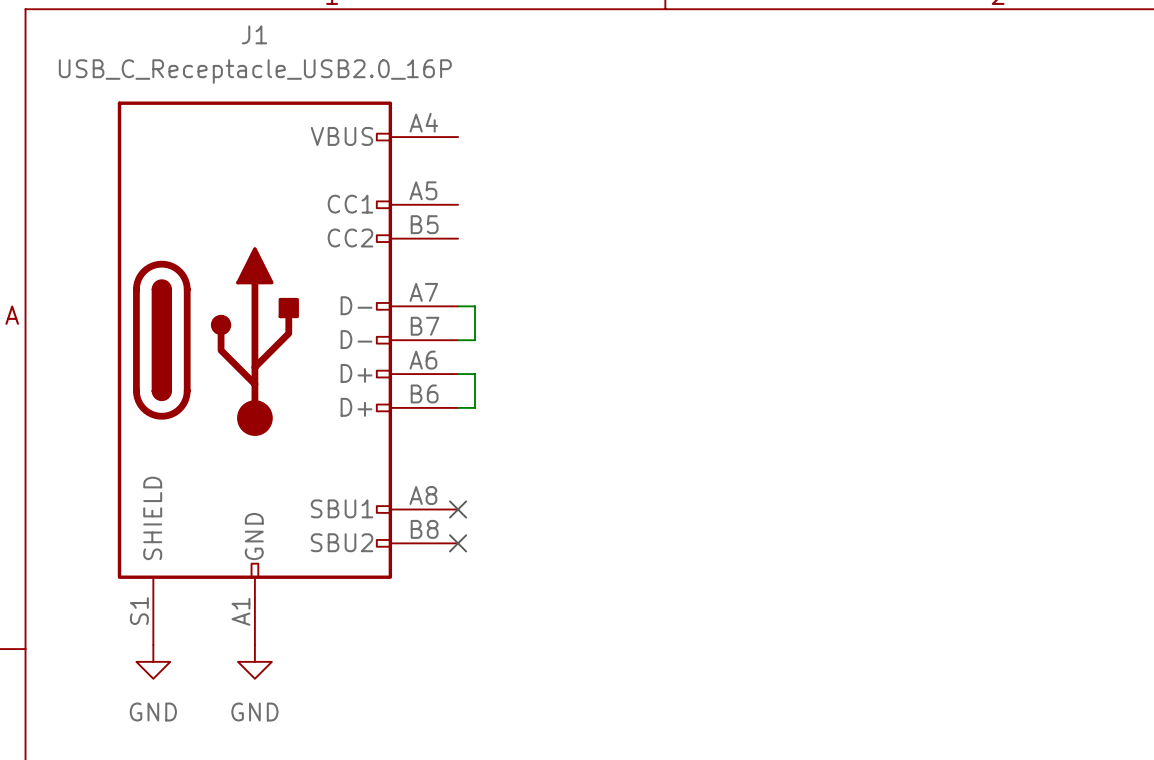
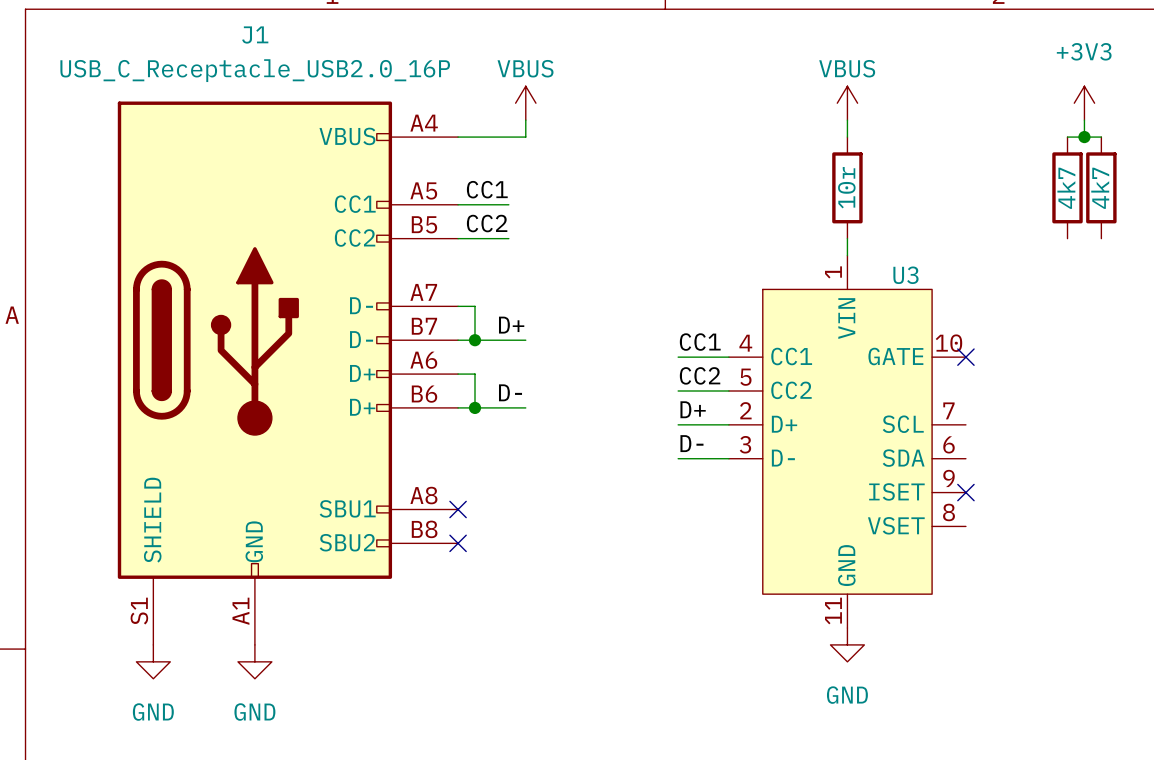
power symbol: none -> VBUS (525, 103)
power symbol: none -> VBUS (847, 103)
power symbol: none -> +3V3 (1084, 103)
wire: none -> (525, 120) (525, 137) (458, 137)
wire: none -> (847, 120) (847, 137)
wire: none -> (1084, 120) (1084, 137)
wire: none -> (1067, 137) (1101, 137)
junction: none -> (1084, 137)
part: none -> 10r (847, 187)
part: none -> 4k7 (1067, 187)
part: none -> 4k7 (1101, 187)
label: none -> CC1 (487, 189)
wire: none -> (458, 204) (508, 204)
label: none -> CC2 (487, 223)
wire: none -> (458, 238) (508, 238)
wire: none -> (847, 238) (847, 255)
label: none -> D+ (511, 325)
wire: none -> (475, 340) (525, 340)
junction: none -> (475, 340)
label: none -> CC1 (700, 342)
wire: none -> (678, 357) (728, 357)
no-connect mark: none -> (965, 357)
label: none -> CC2 (700, 375)
wire: none -> (678, 391) (728, 391)
label: none -> D- (510, 392)
wire: none -> (475, 407) (525, 407)
junction: none -> (475, 407)
label: none -> D+ (693, 409)
wire: none -> (678, 424) (728, 424)
U3: none -> (847, 441)
label: none -> D- (691, 443)
wire: none -> (678, 458) (728, 458)
no-connect mark: none -> (965, 492)
power symbol: none -> GND (847, 644)

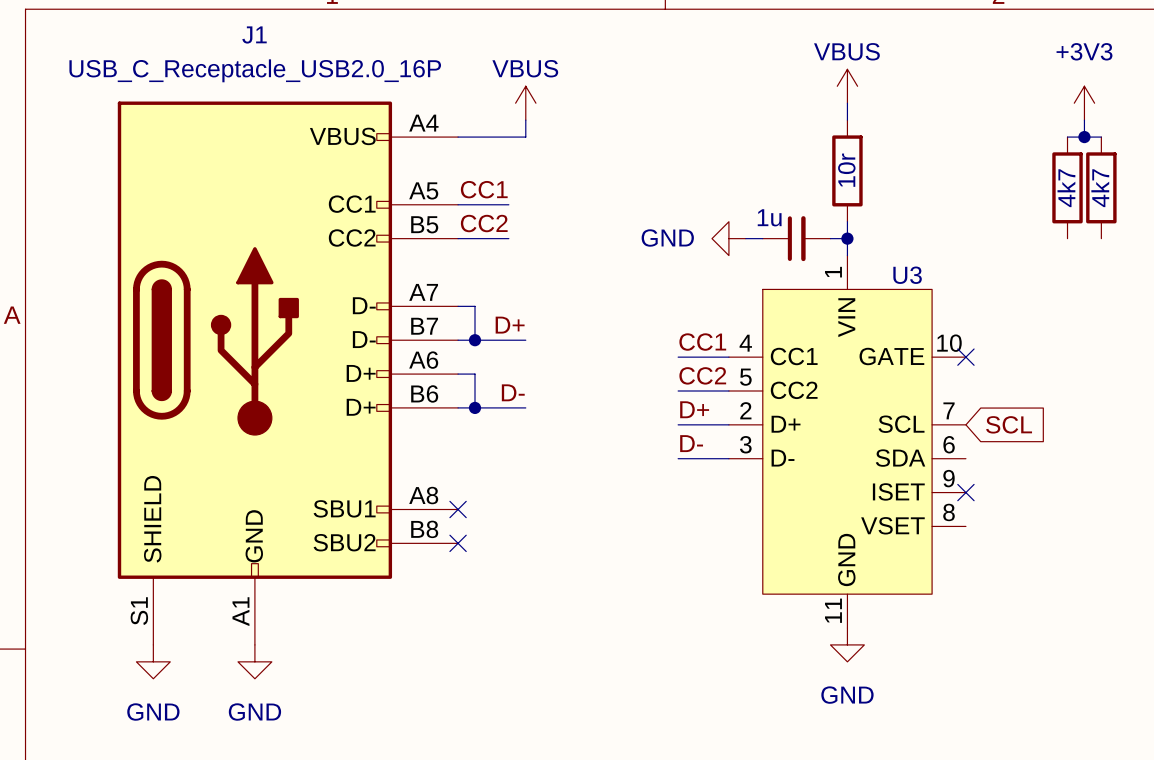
power symbol position: VBUS (847, 103) -> VBUS (847, 86)
part position: (847, 187) -> (847, 170)
wire: none -> (847, 221) (847, 238) (830, 238)
power symbol: none -> GND (728, 238)
wire: none -> (745, 238) (762, 238)
part: none -> 1u (796, 238)
junction: none -> (847, 238)
global label: none -> SCL (1009, 424)

